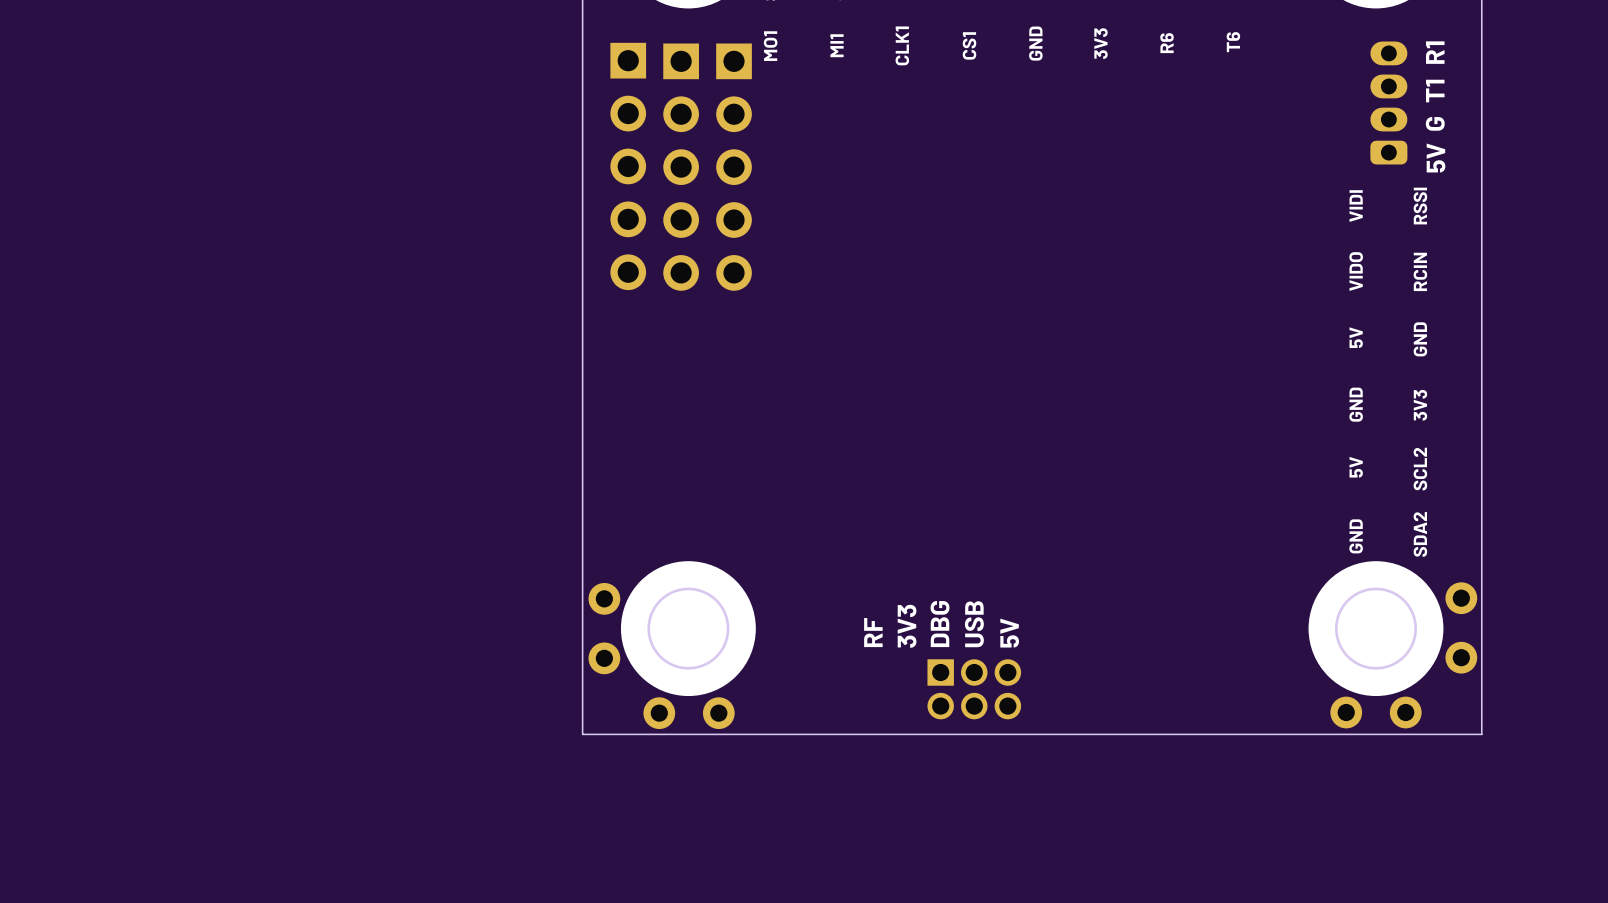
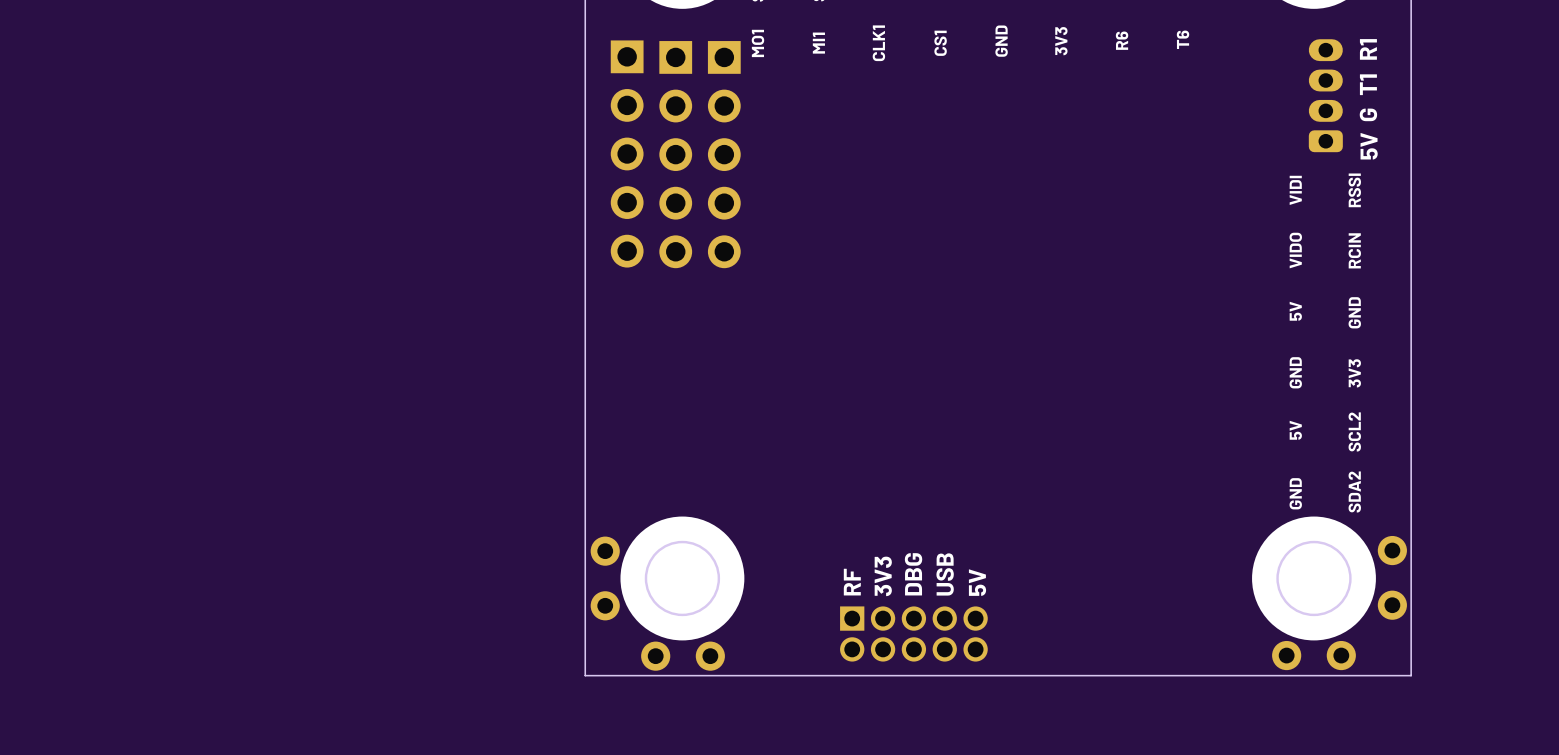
part: none -> (913, 633)
part: (974, 689) -> none

